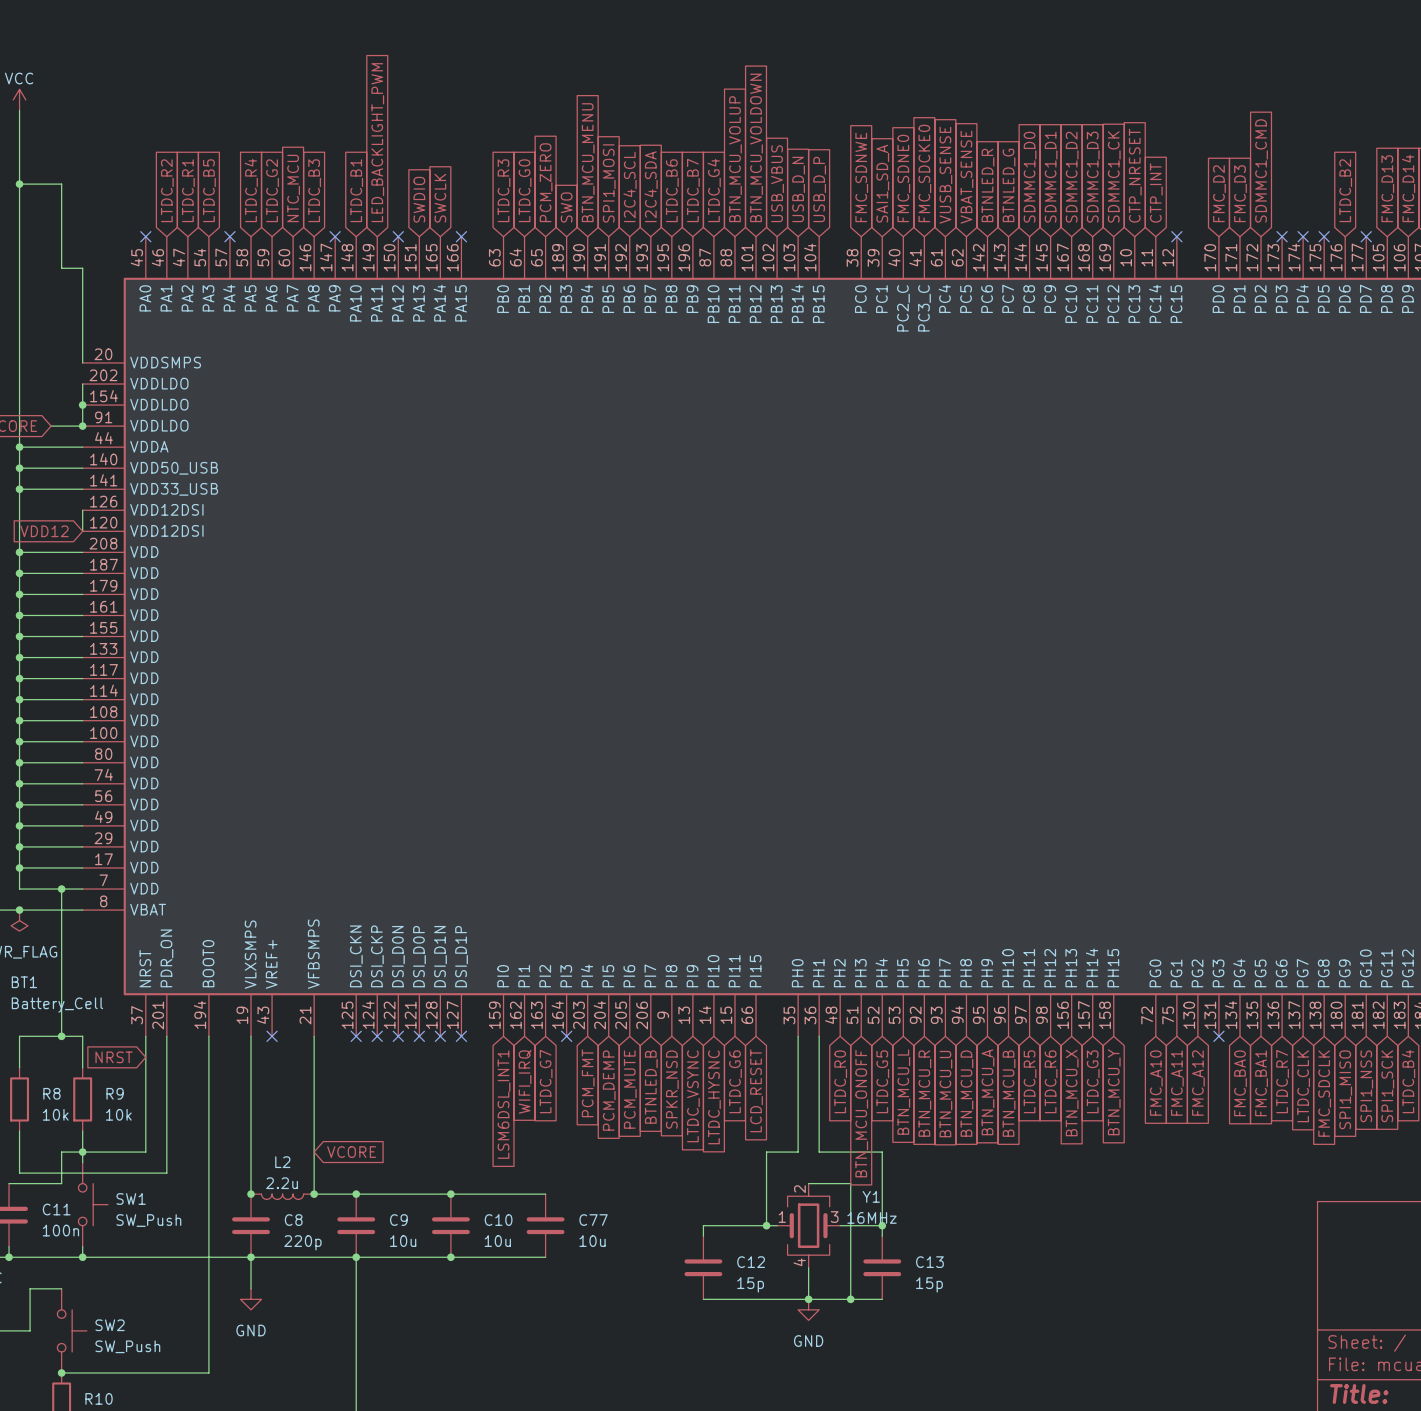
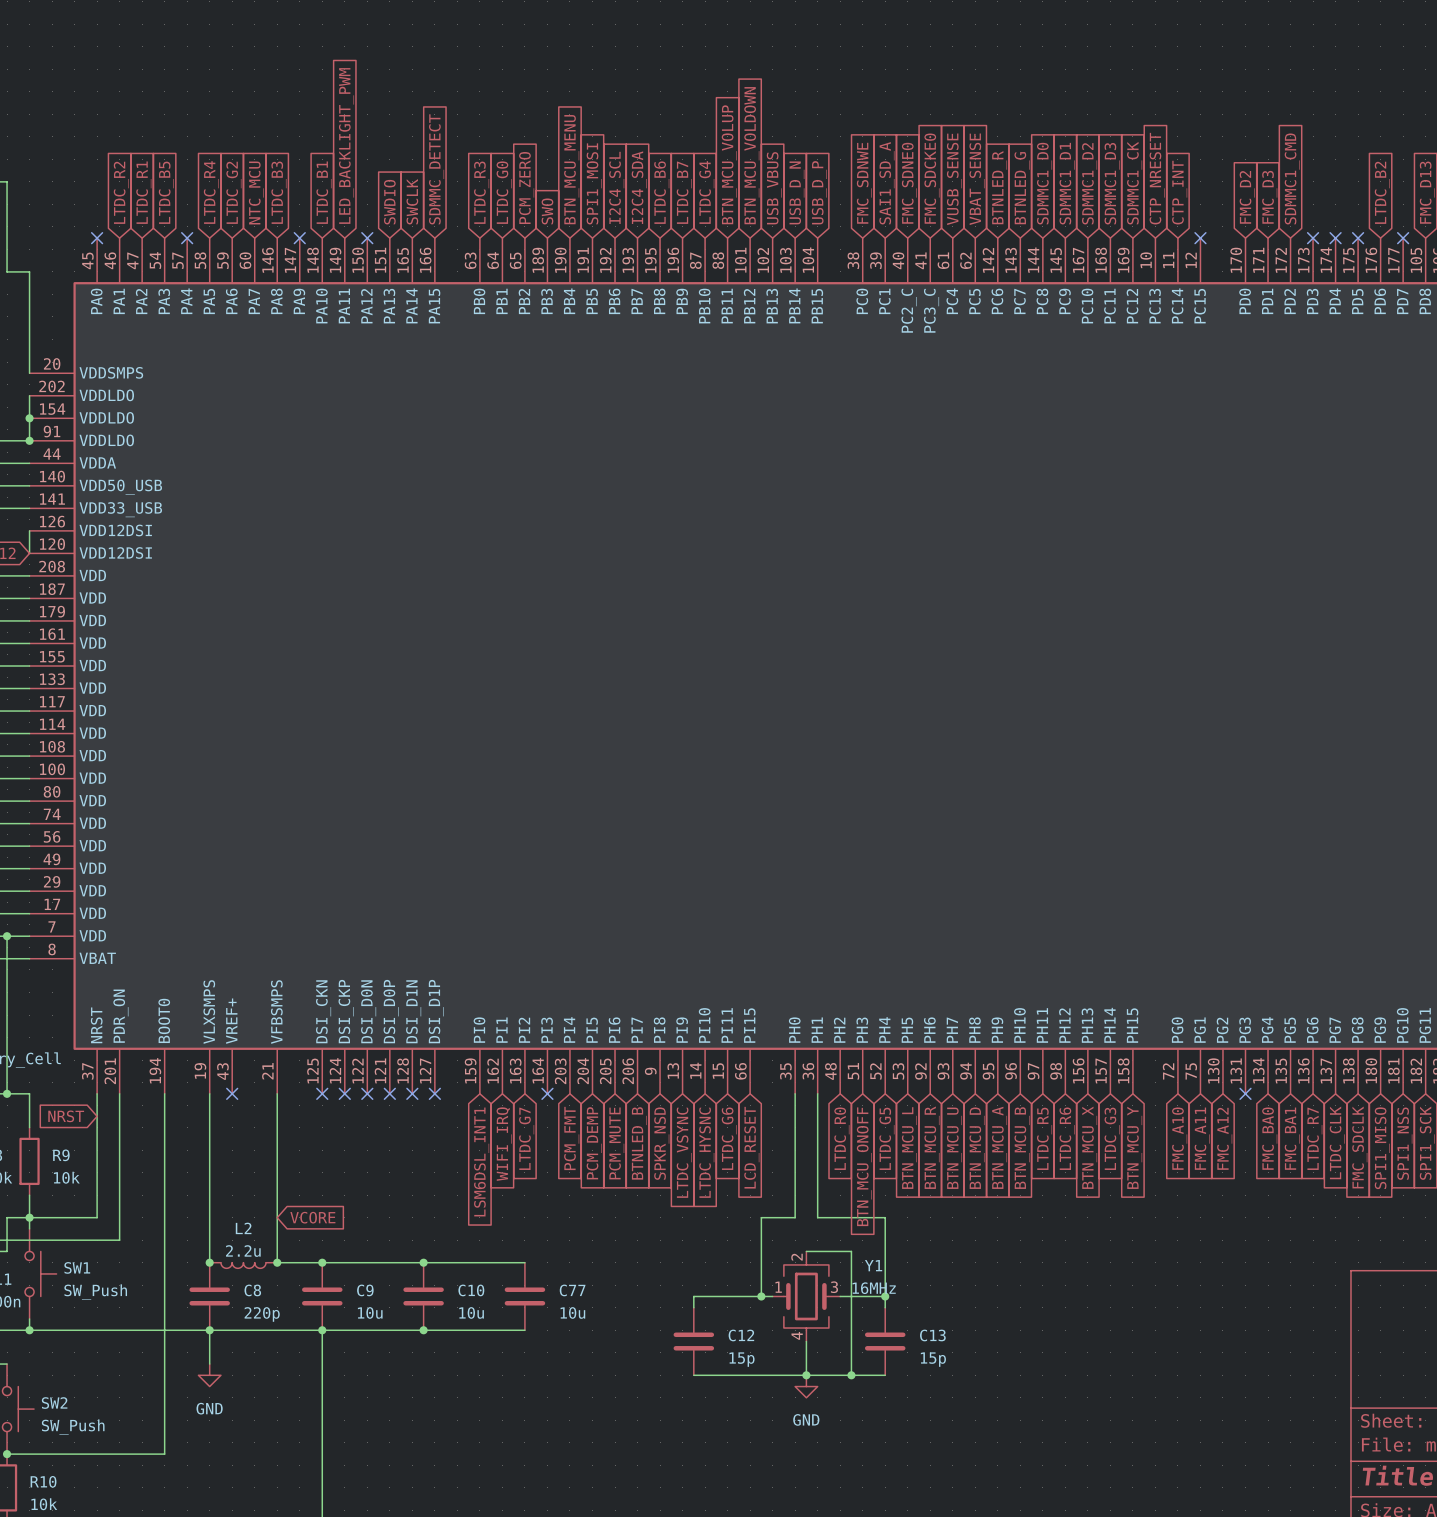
global label: none -> SDMMC_DETECT (436, 169)
no-connect mark: (461, 236) -> none

